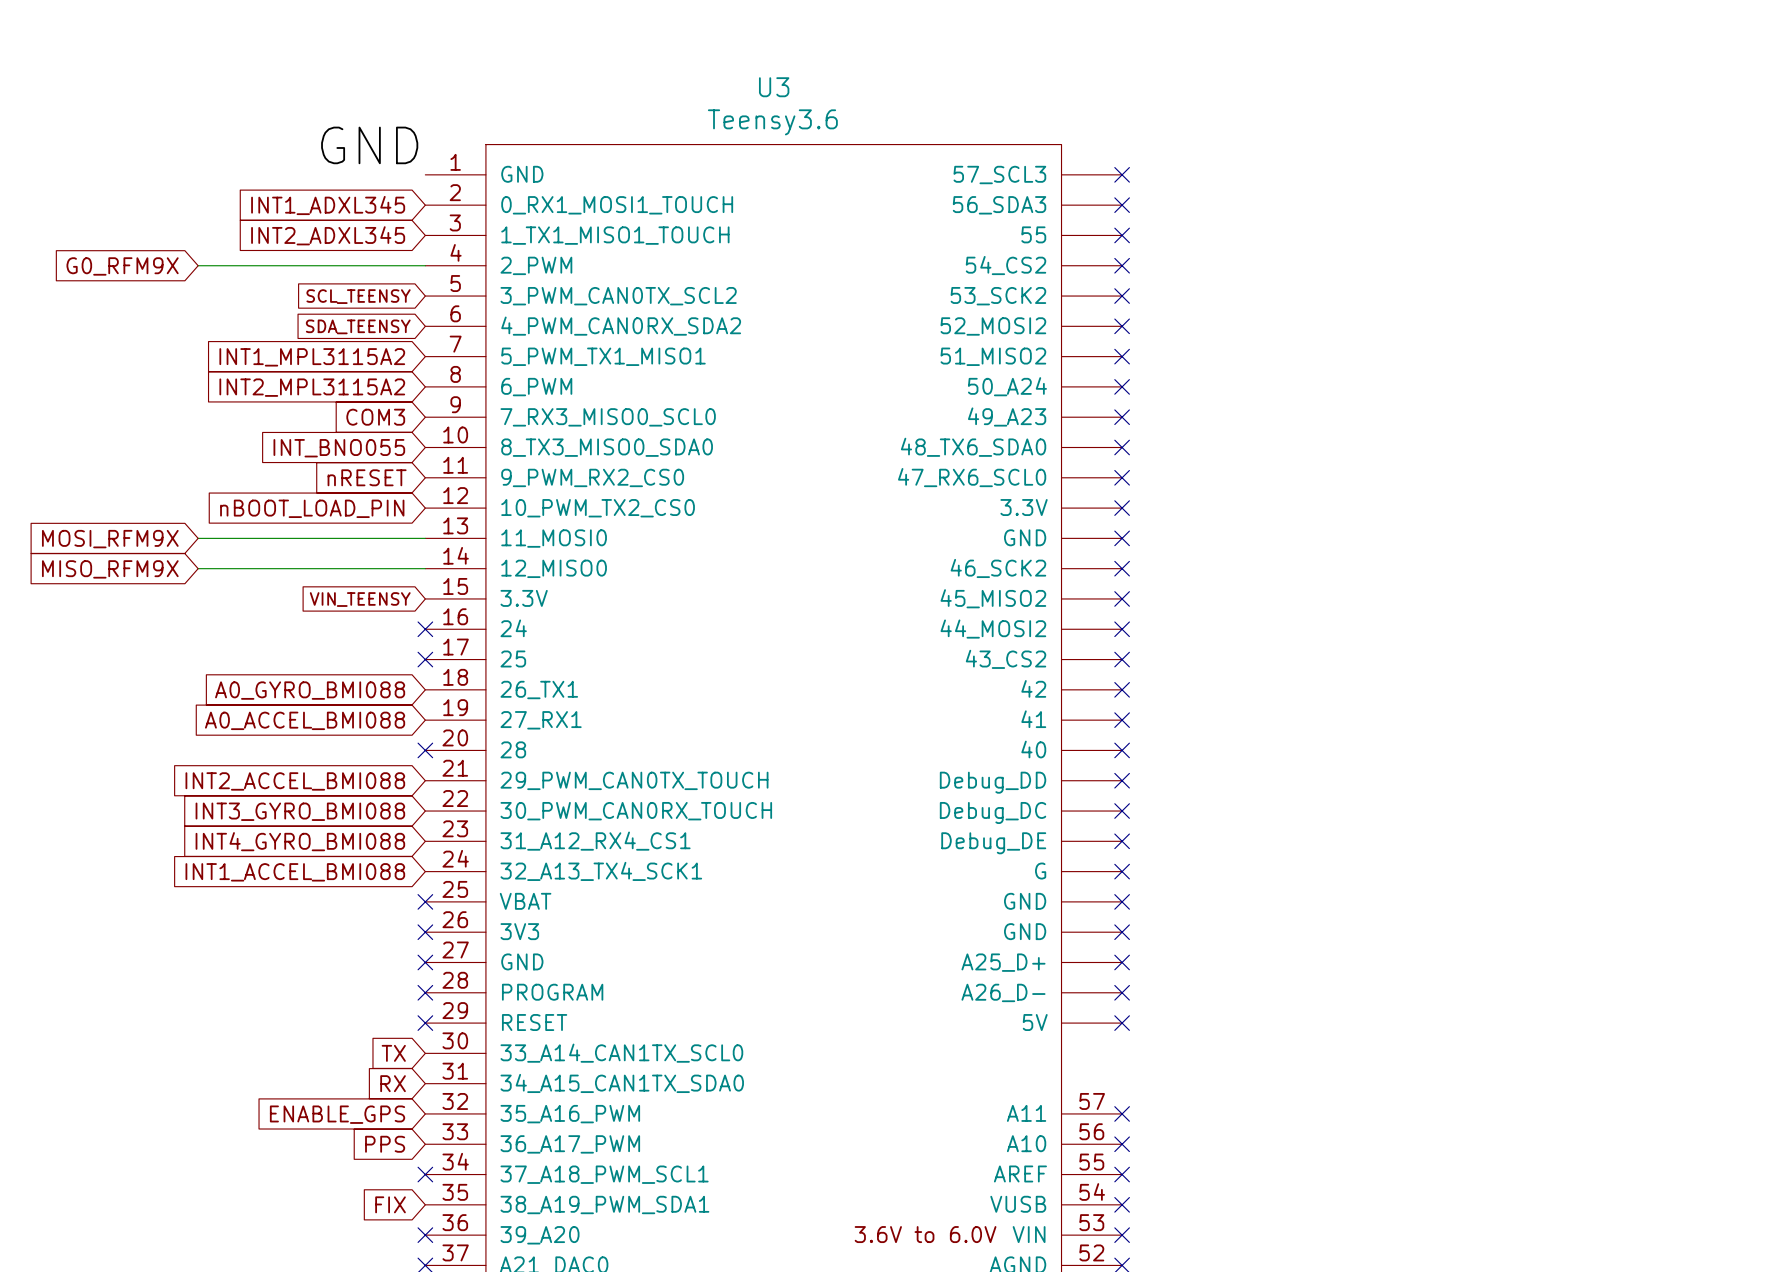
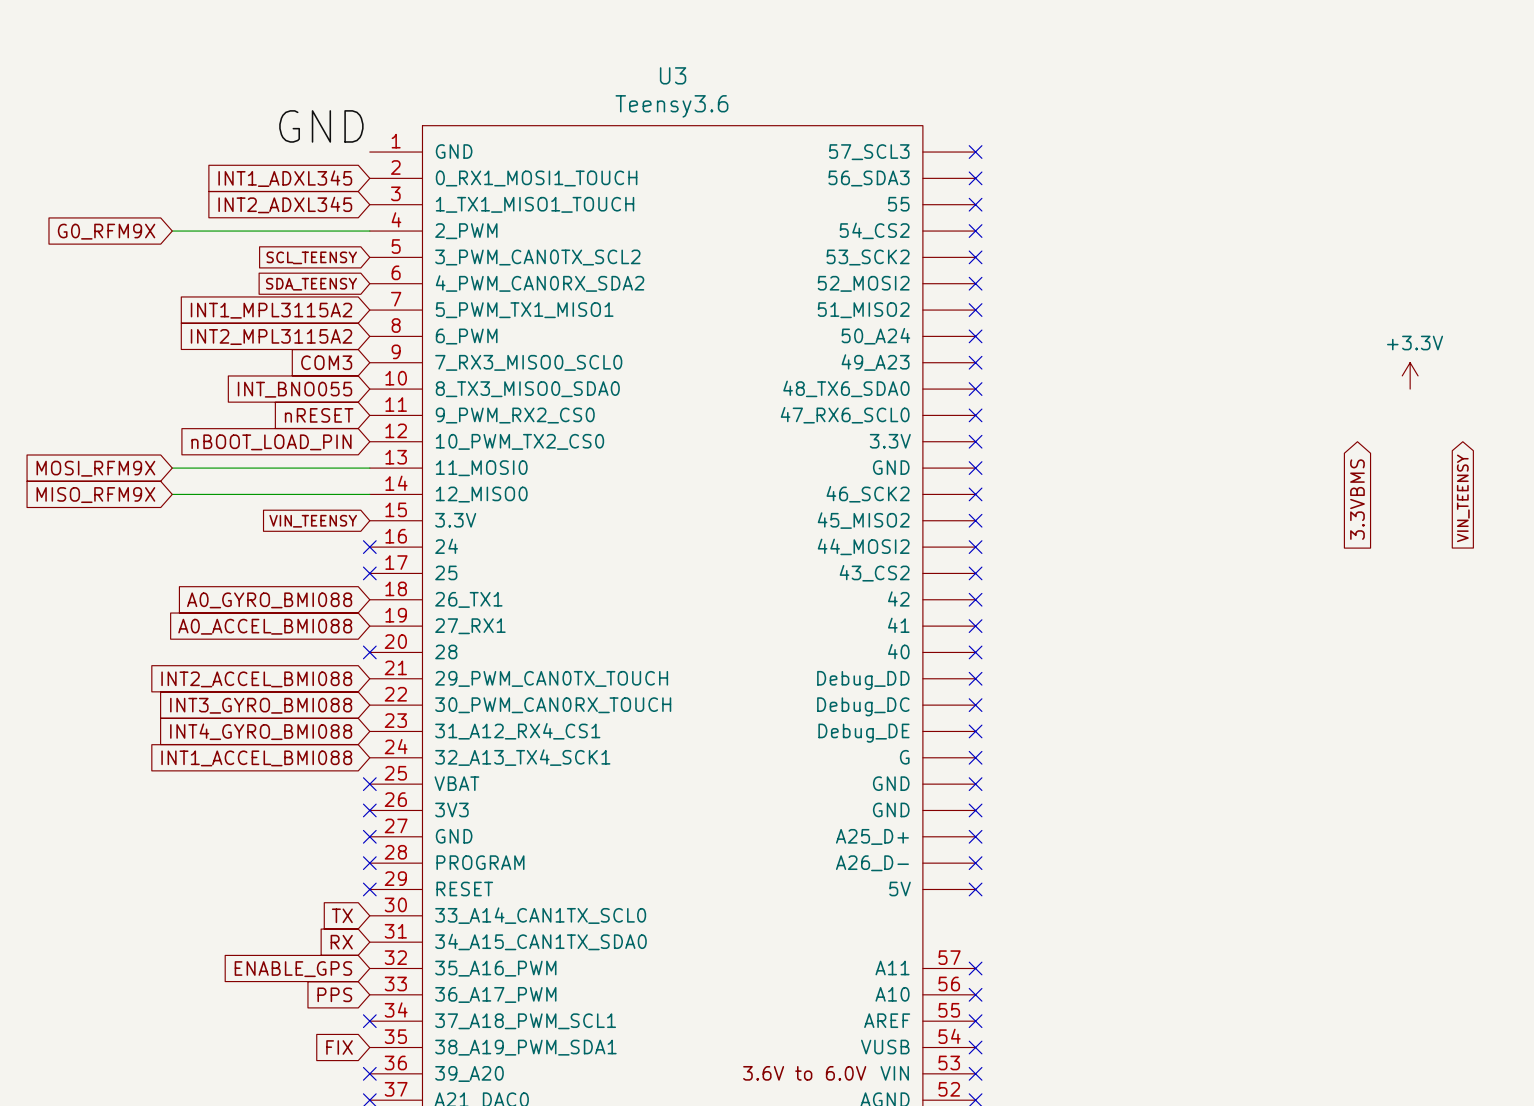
power symbol: none -> +3.3V (1410, 375)
global label: none -> VIN_TEENSY (1463, 498)
global label: none -> 3.3VBMS (1357, 499)

